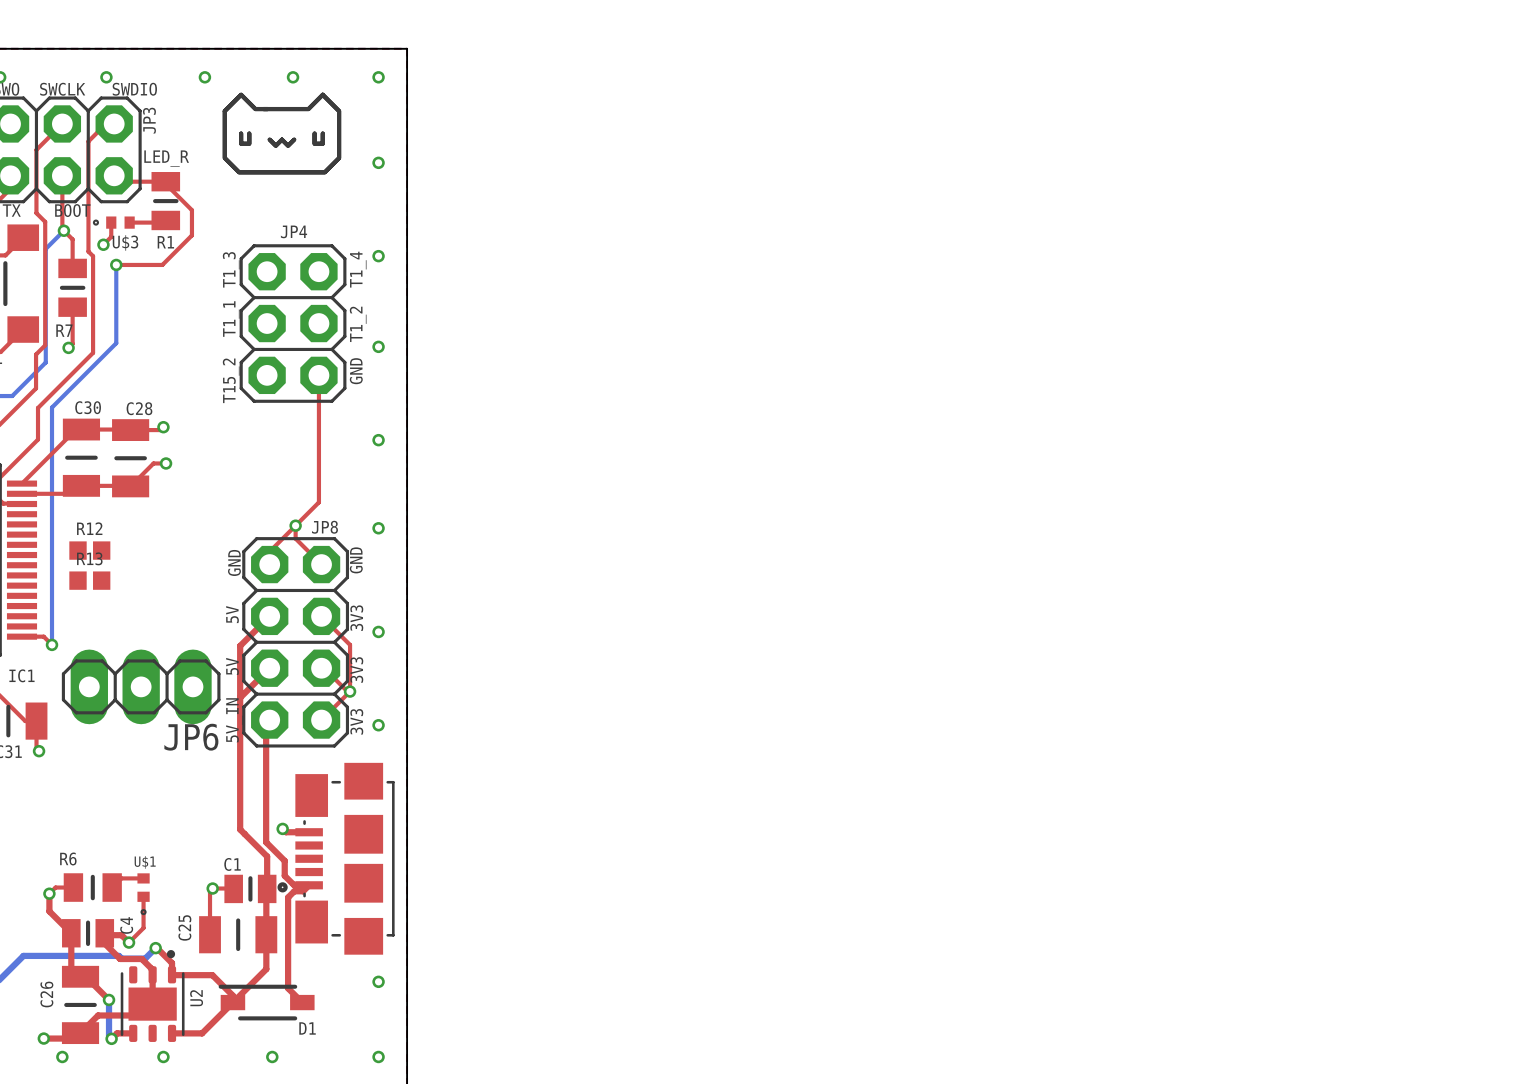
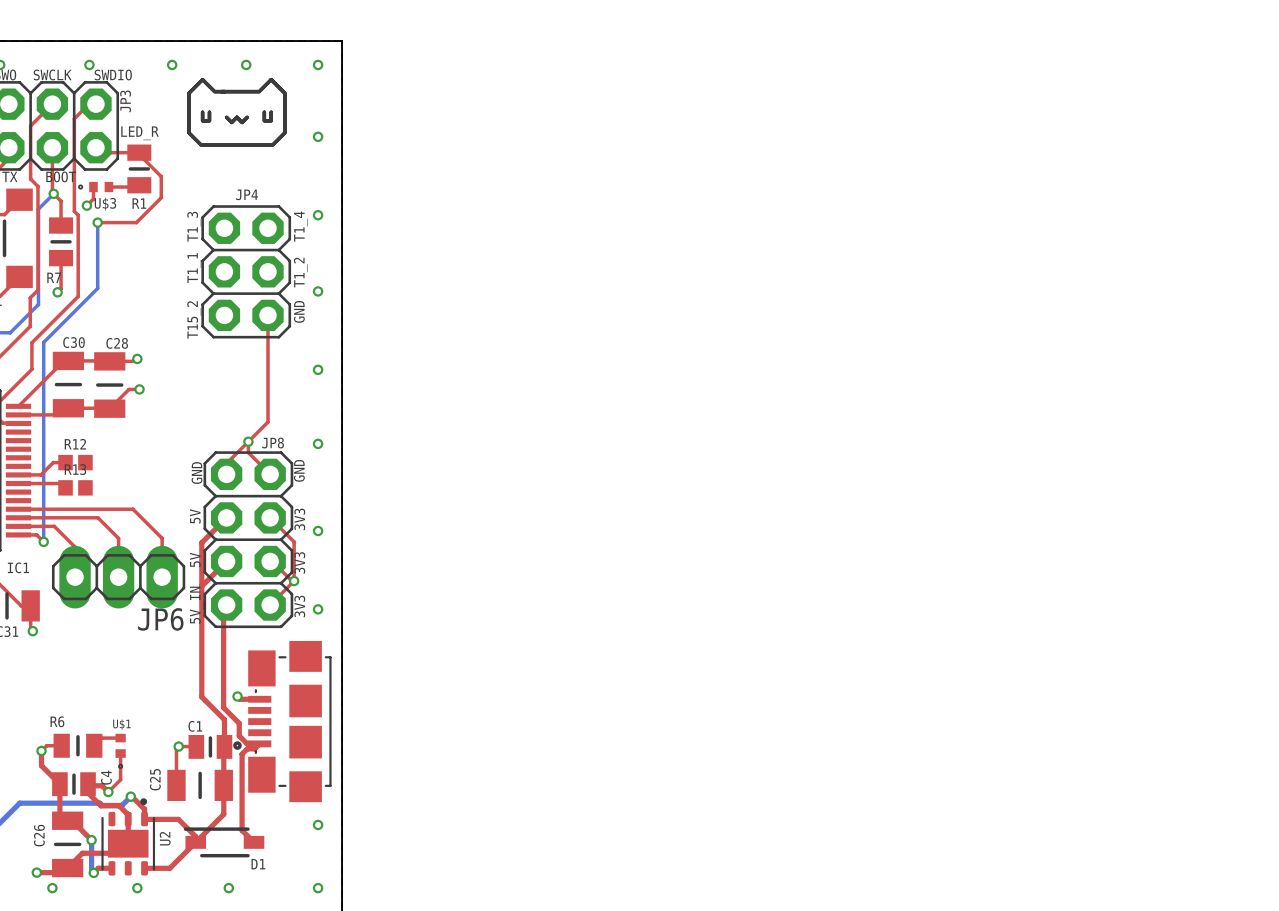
top track: none -> (65, 462) (53, 462) (40, 474) (18, 474)
top track: none -> (18, 483) (61, 483) (65, 487)
top track: none -> (18, 509) (133, 509) (162, 538) (162, 577)
top track: none -> (18, 517) (98, 517) (118, 538) (118, 577)
top track: none -> (18, 526) (54, 526) (75, 547) (75, 577)

